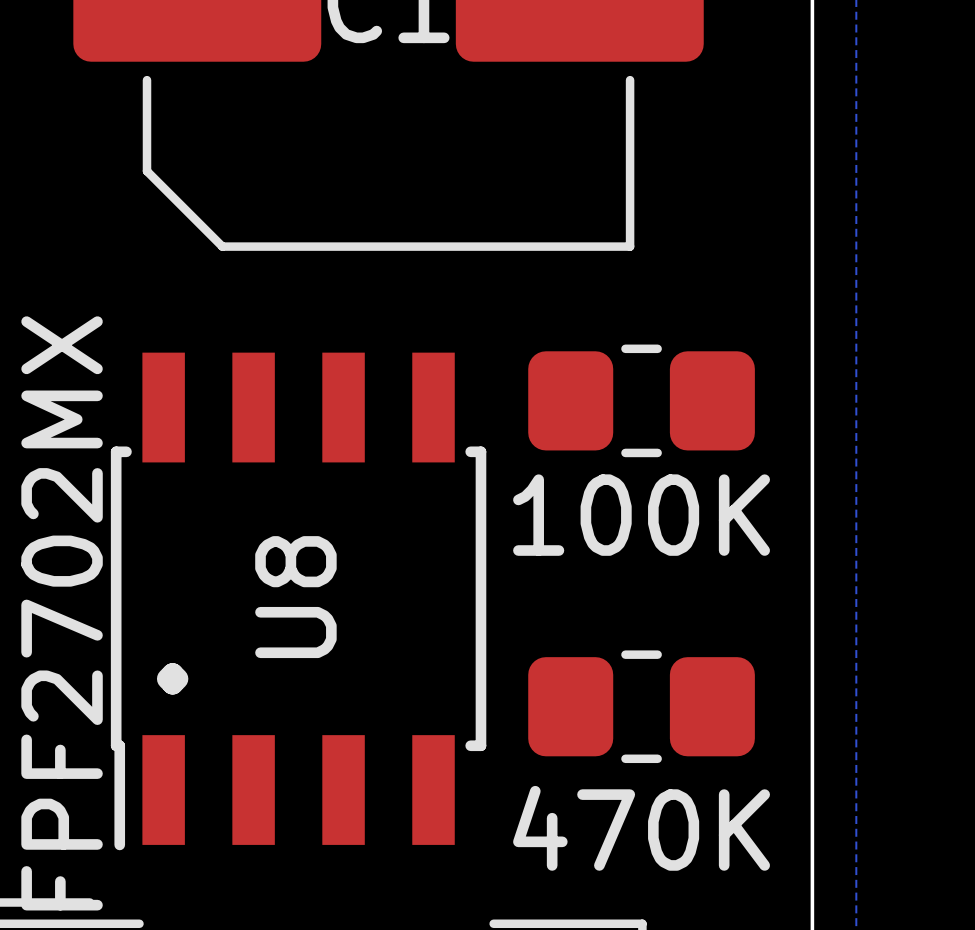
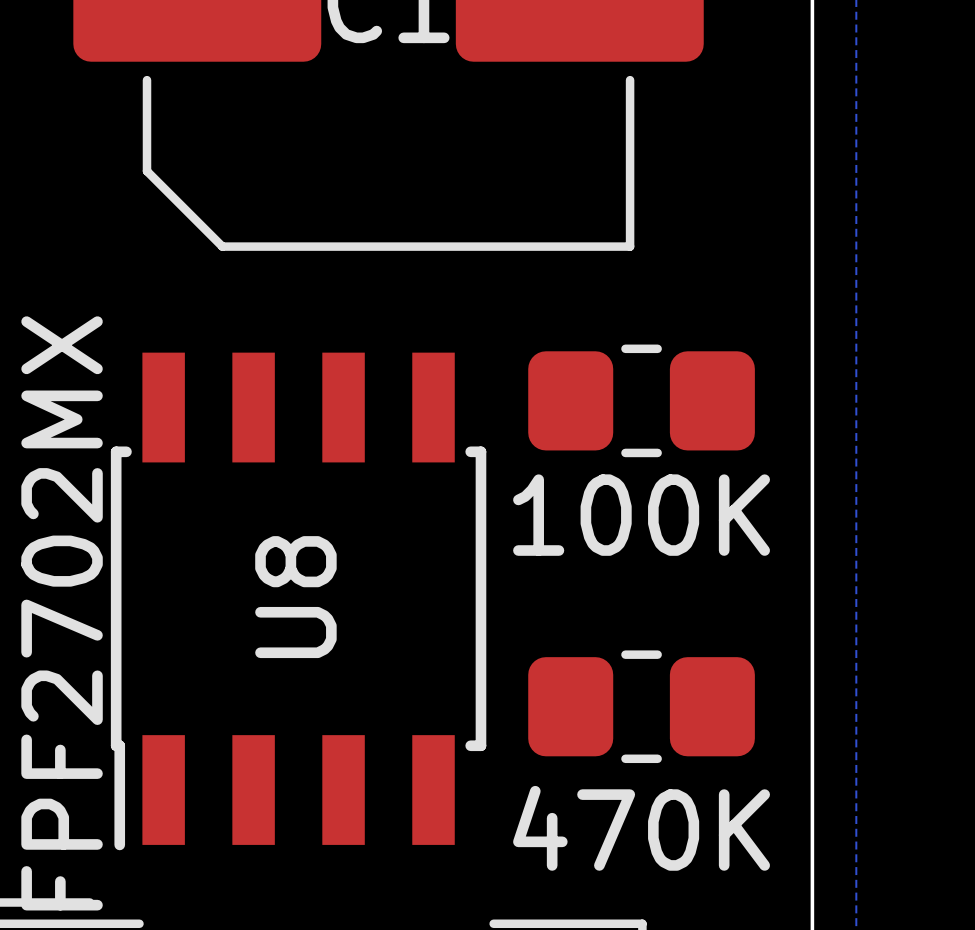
text: . (172, 678) -> none

